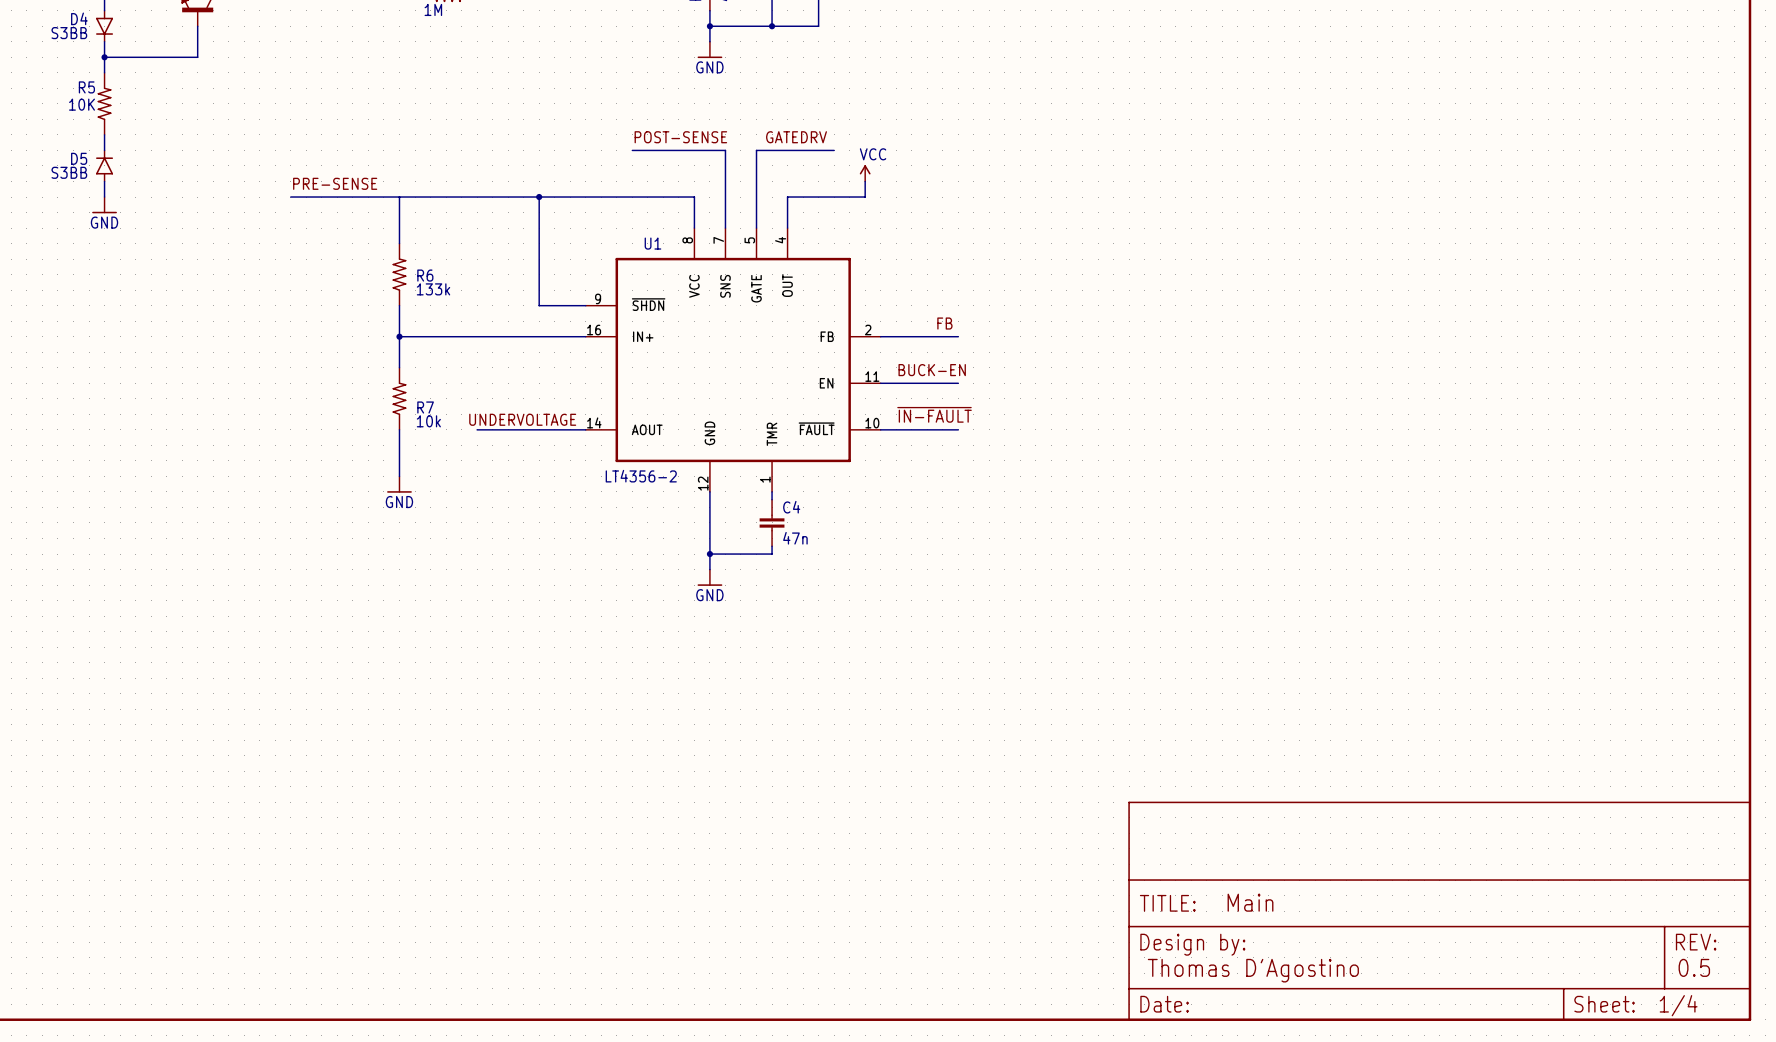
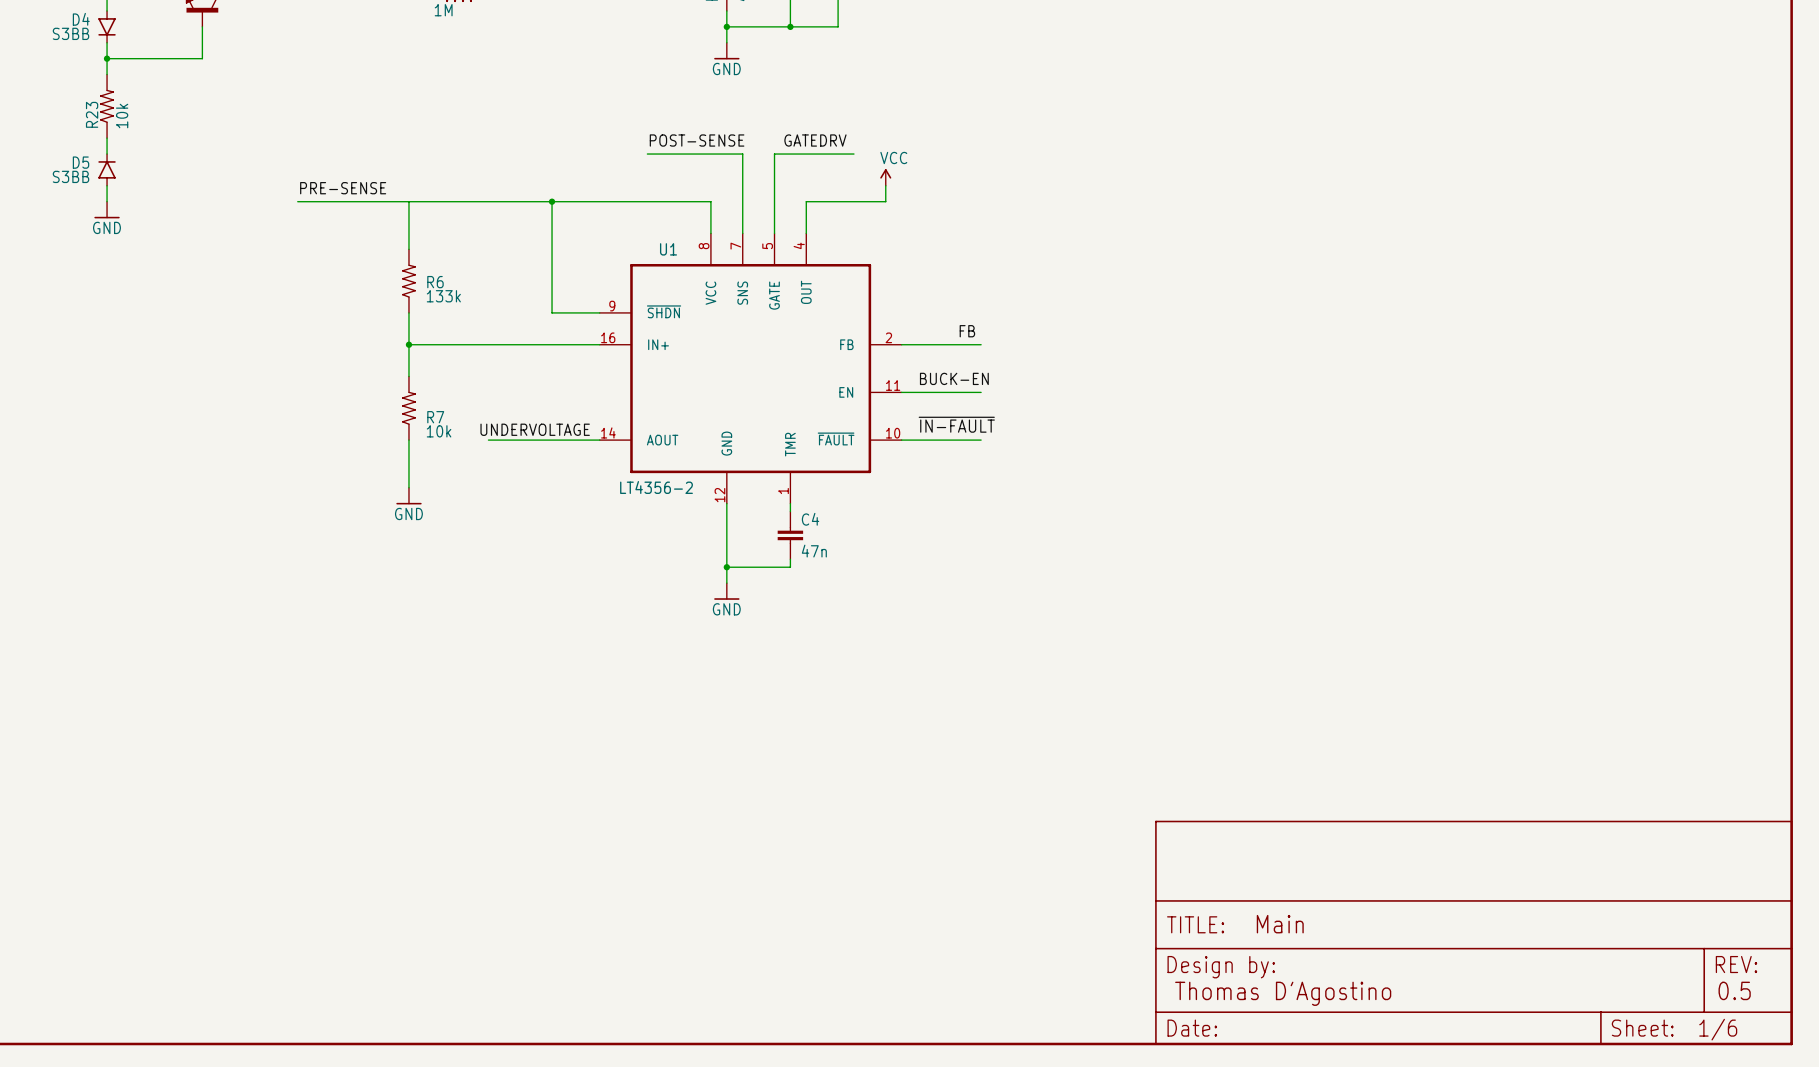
R5 name: R5 (86, 87) -> R23 (92, 114)
R5 value: 10K (82, 104) -> 10k (122, 116)
part text: 1/4 (1678, 1005) -> 1/6 (1718, 1029)

